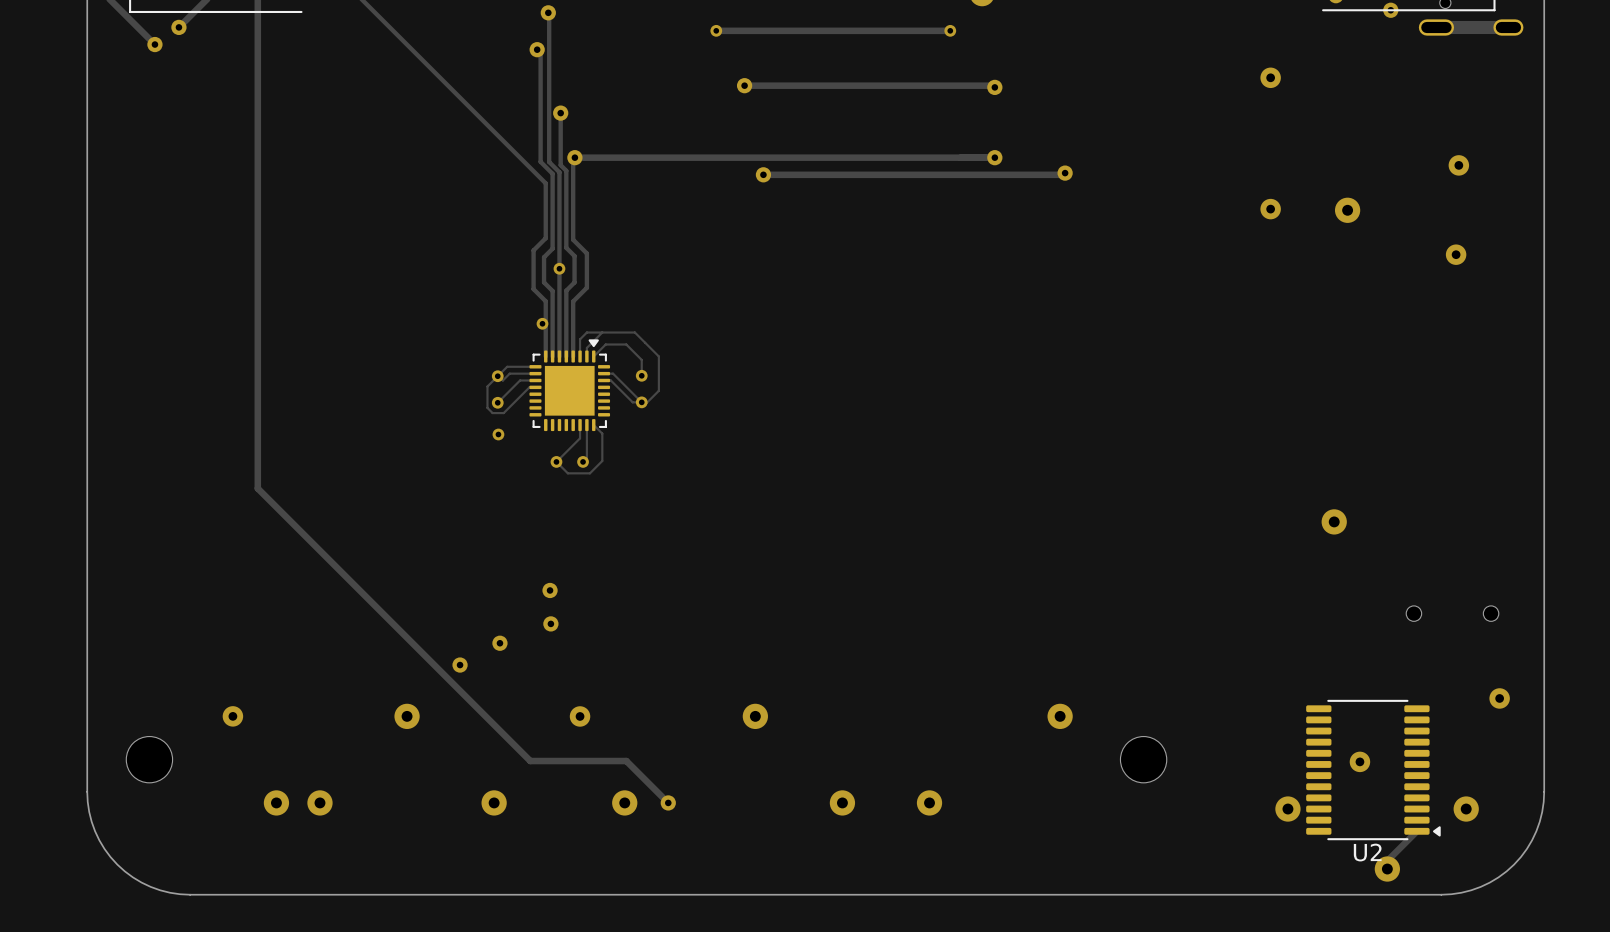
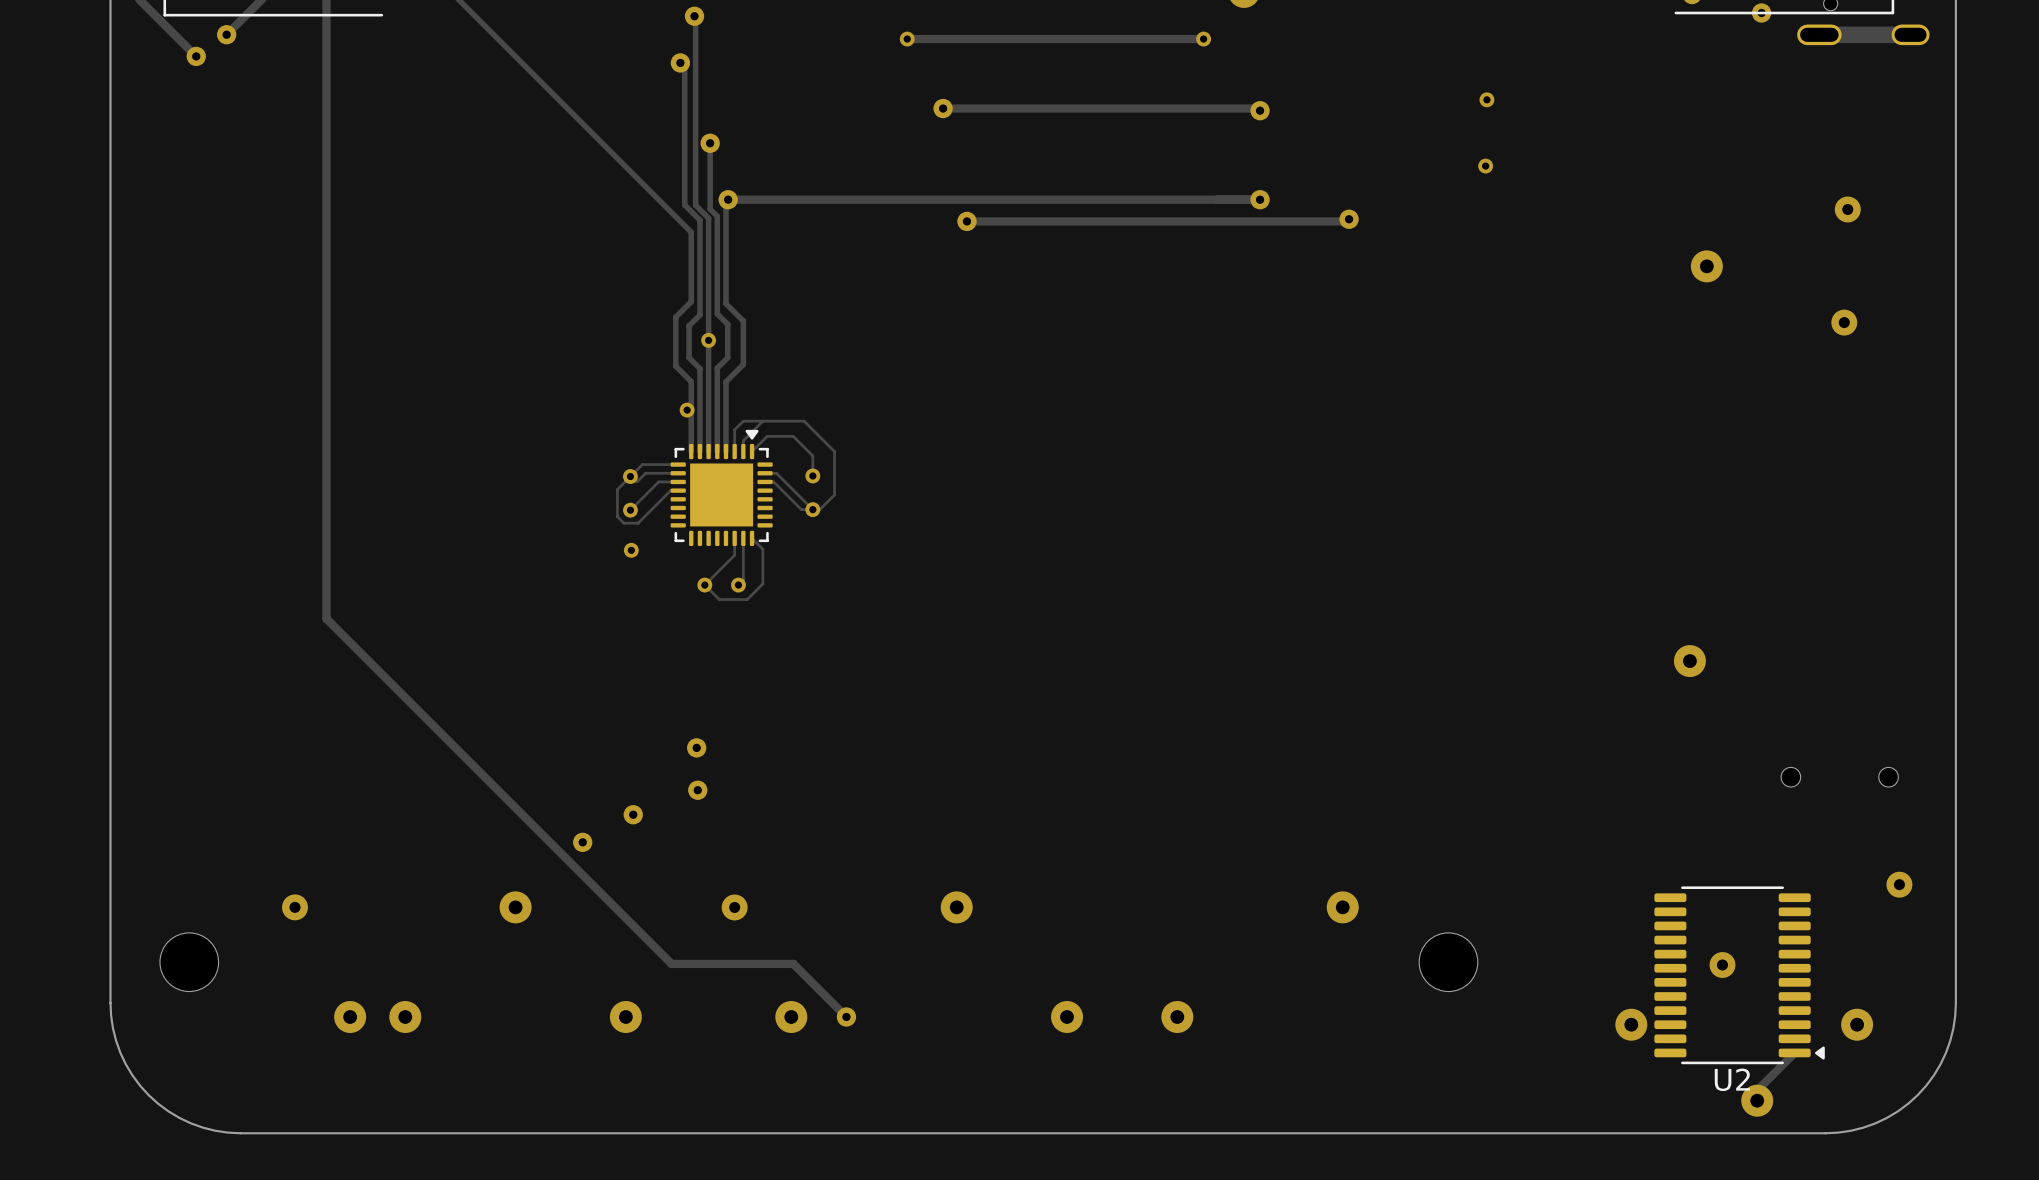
via: (1270, 77) -> none
via: none -> (1486, 99)
via: none -> (1485, 166)
via: (1270, 209) -> none

